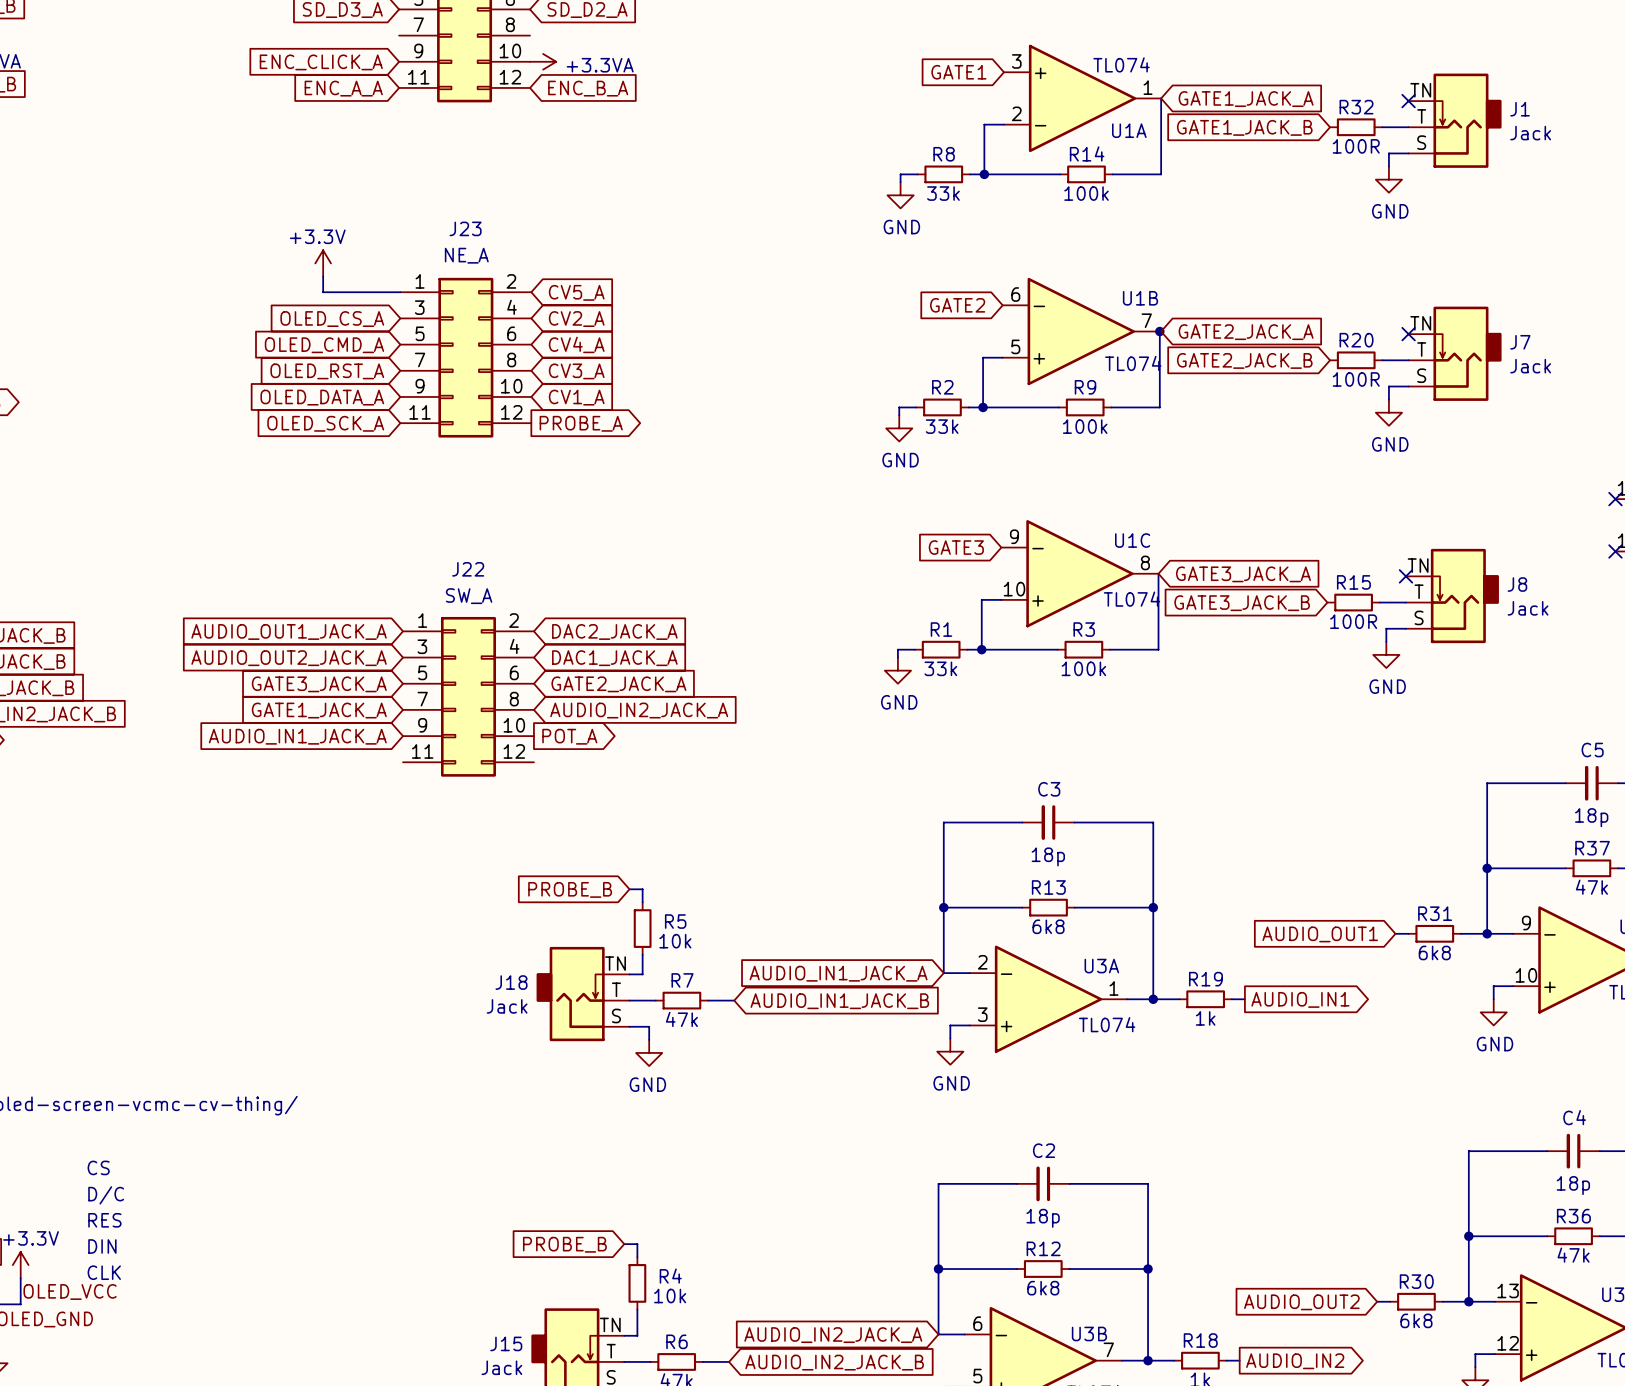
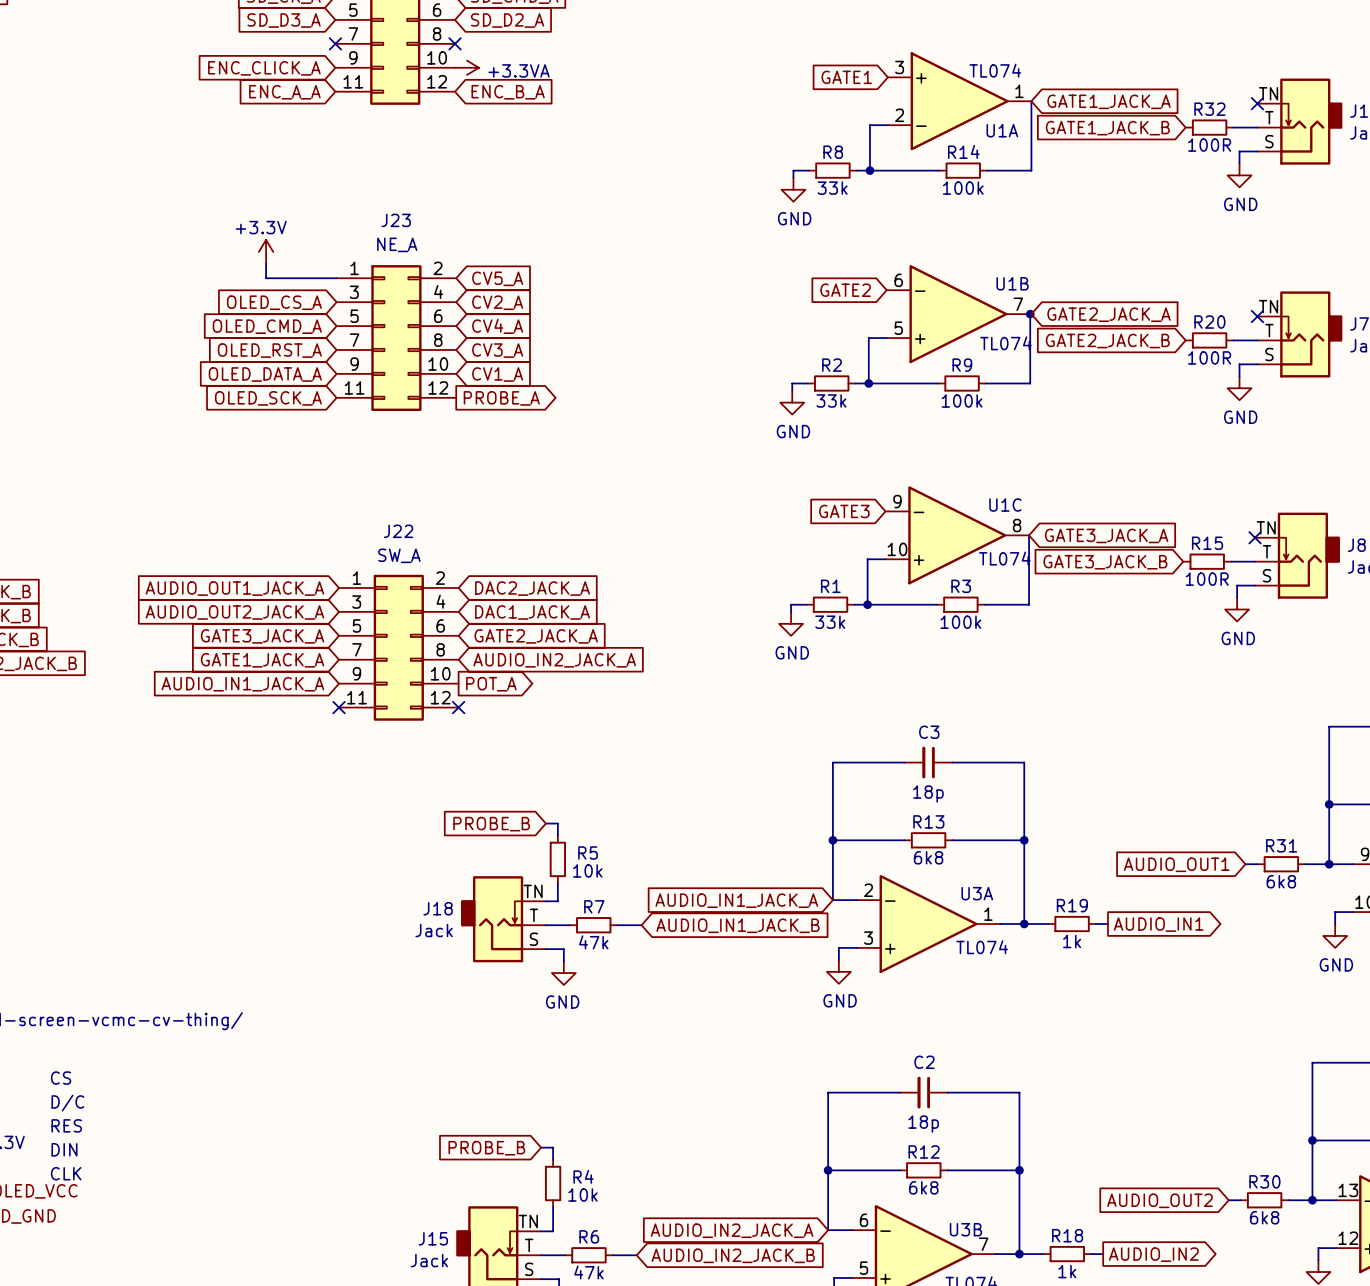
no-connect mark: none -> (335, 43)
no-connect mark: none -> (455, 43)
no-connect mark: none -> (339, 707)
no-connect mark: none -> (458, 707)

